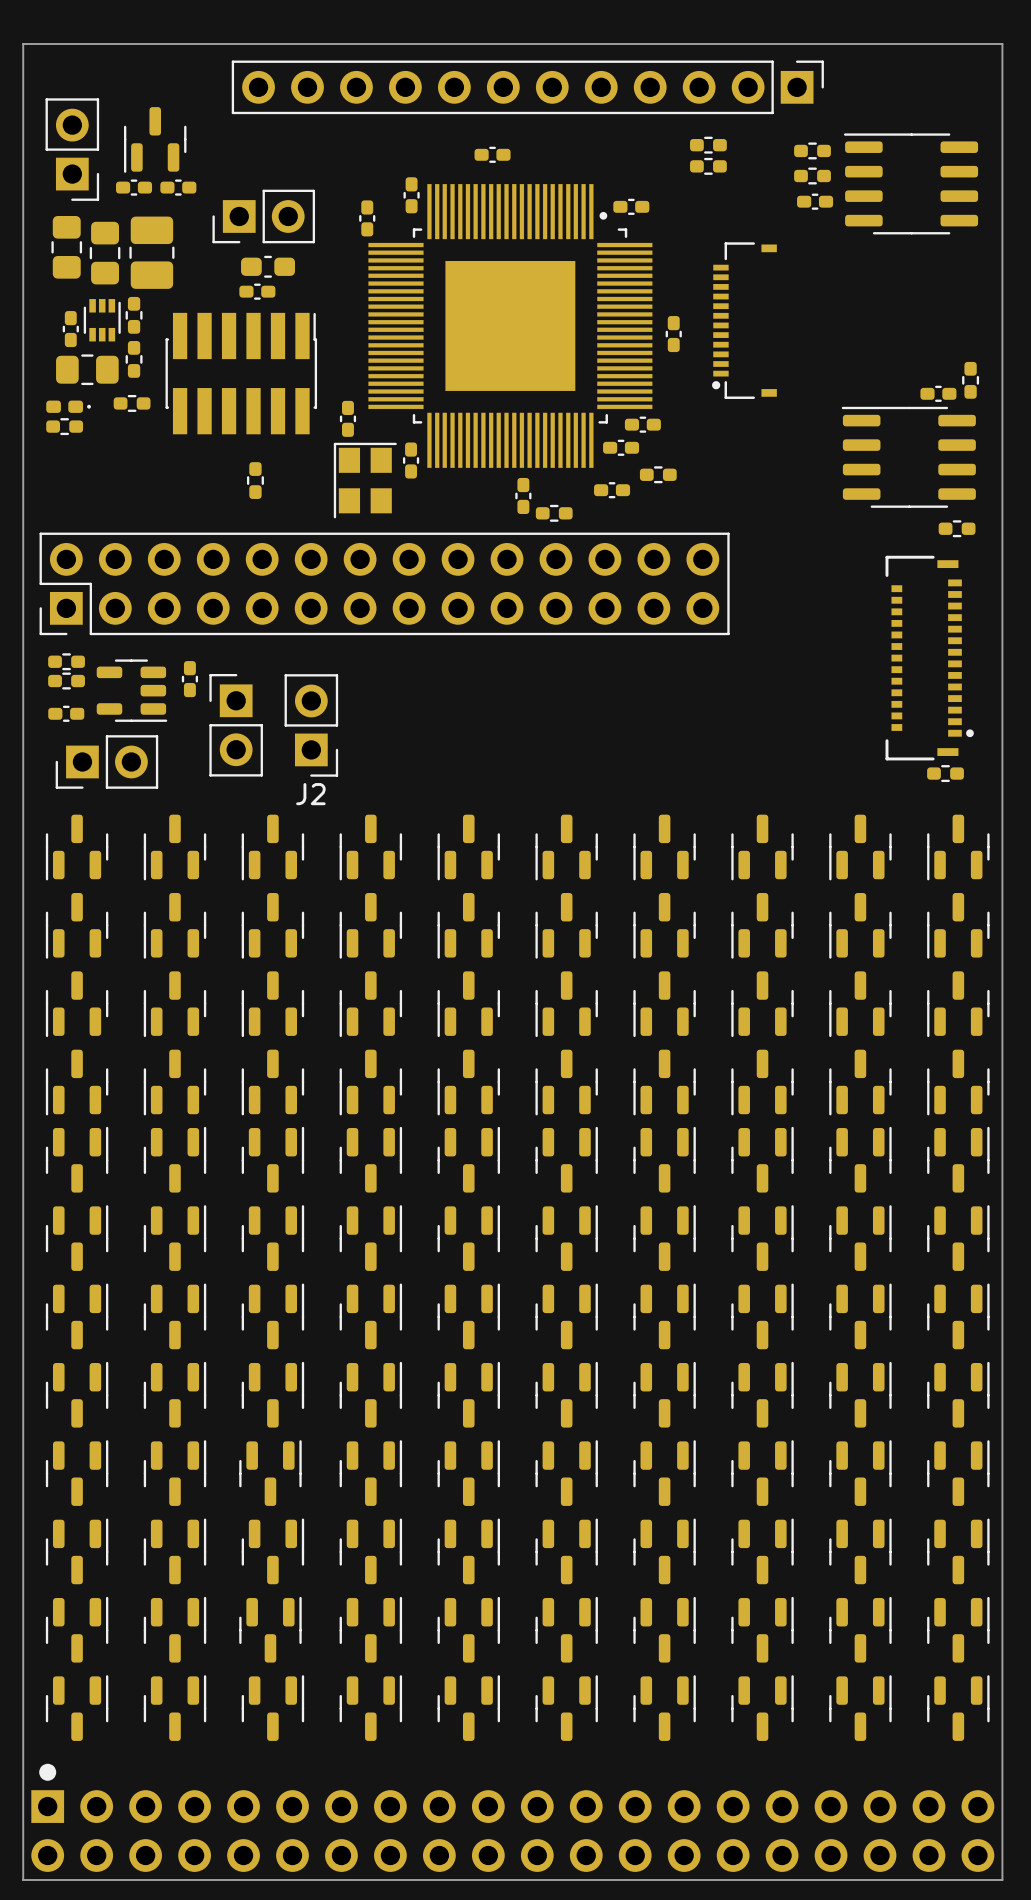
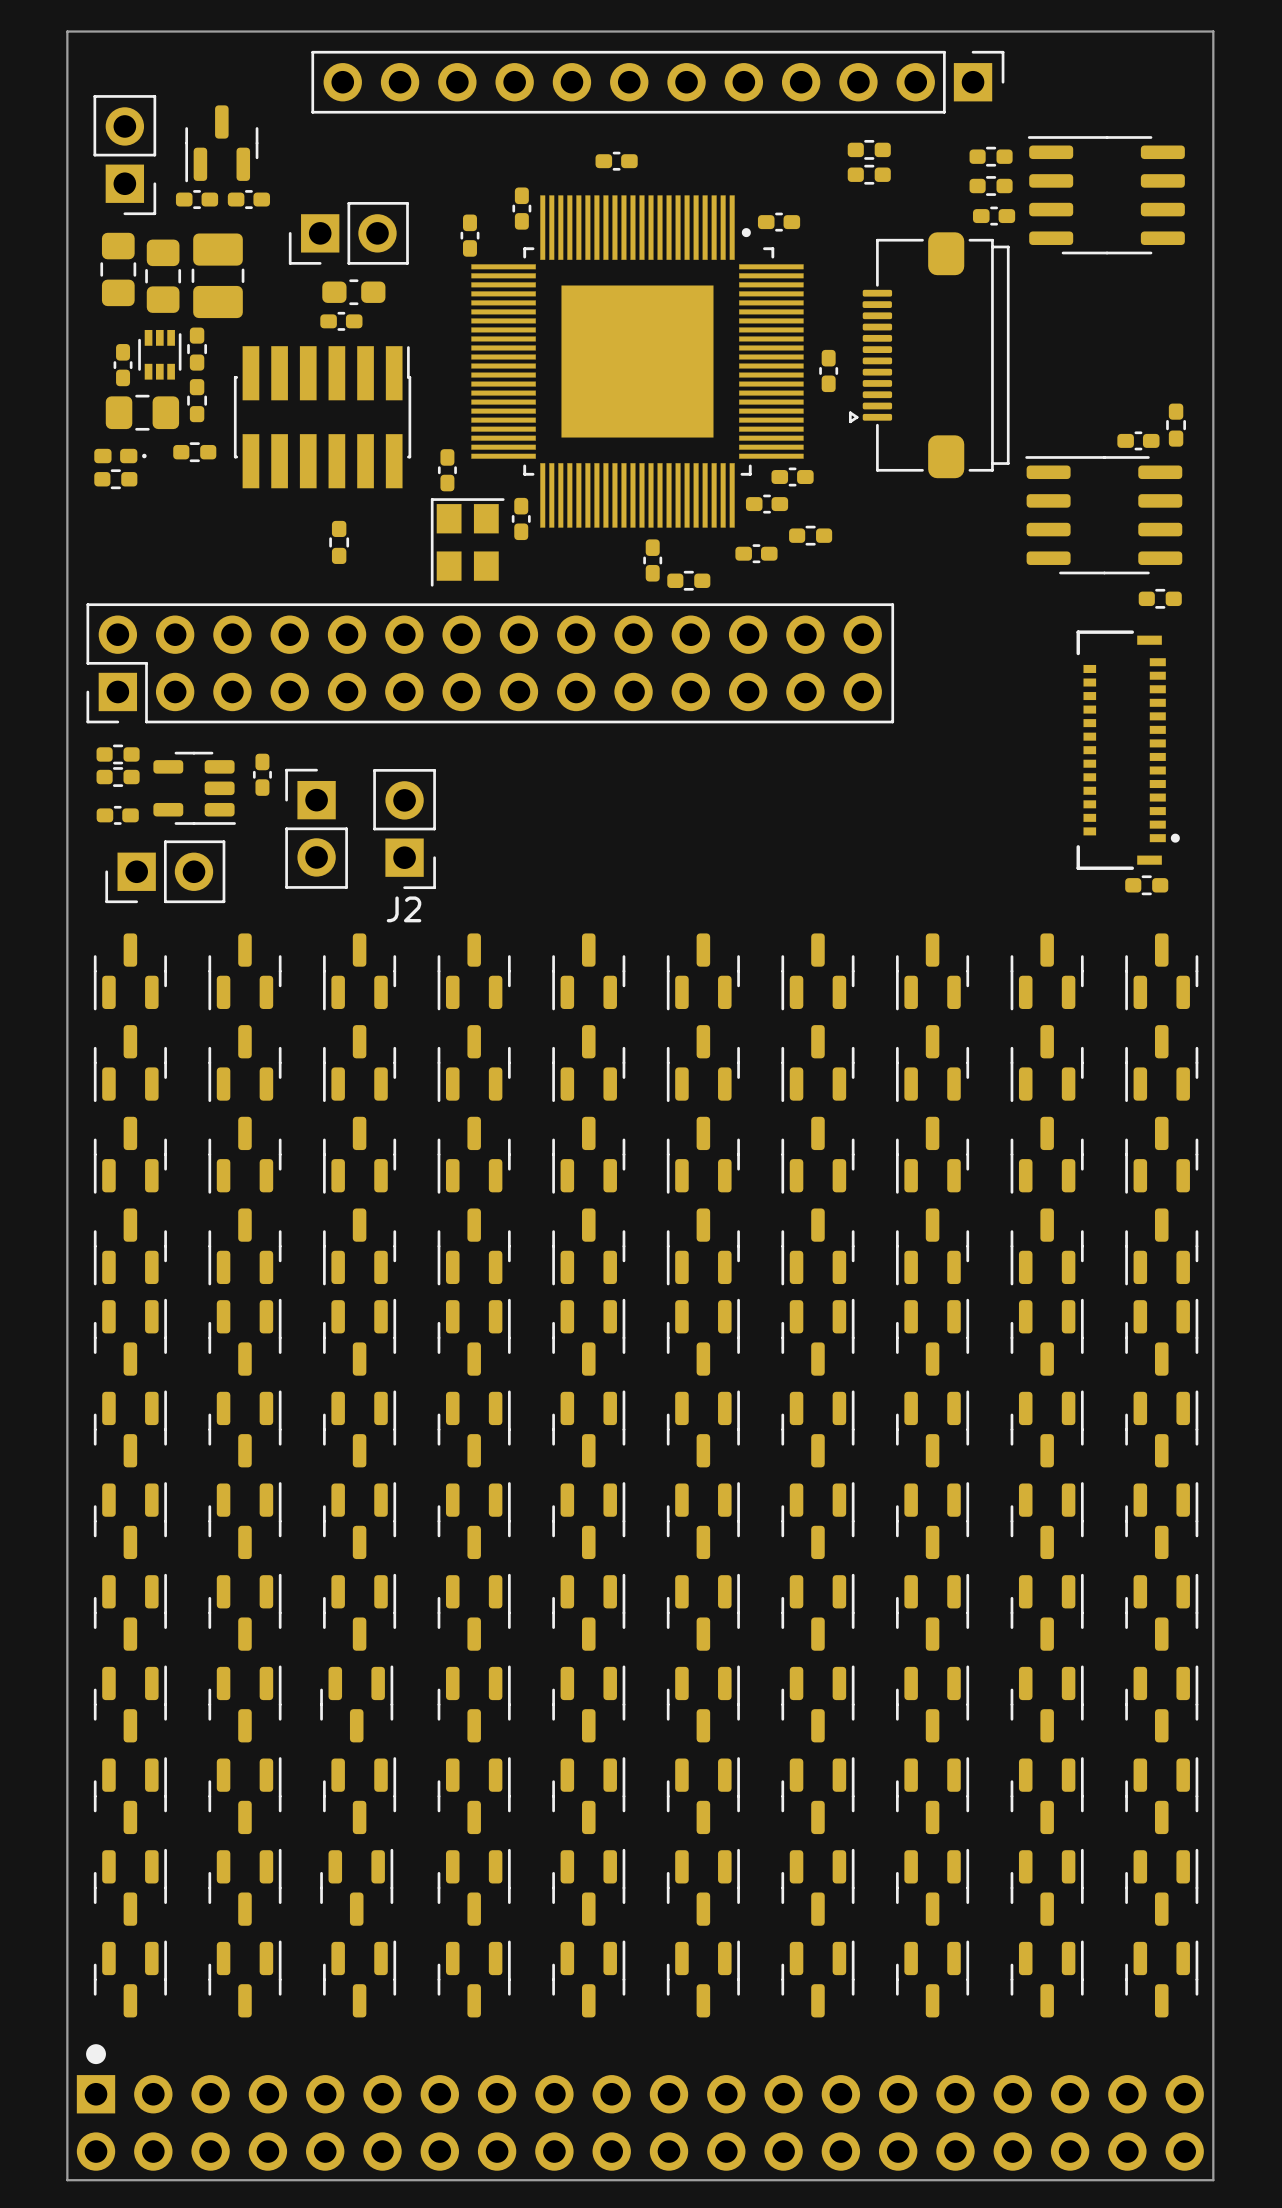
part footprint: [712, 242, 777, 399] -> [848, 232, 1010, 479]

